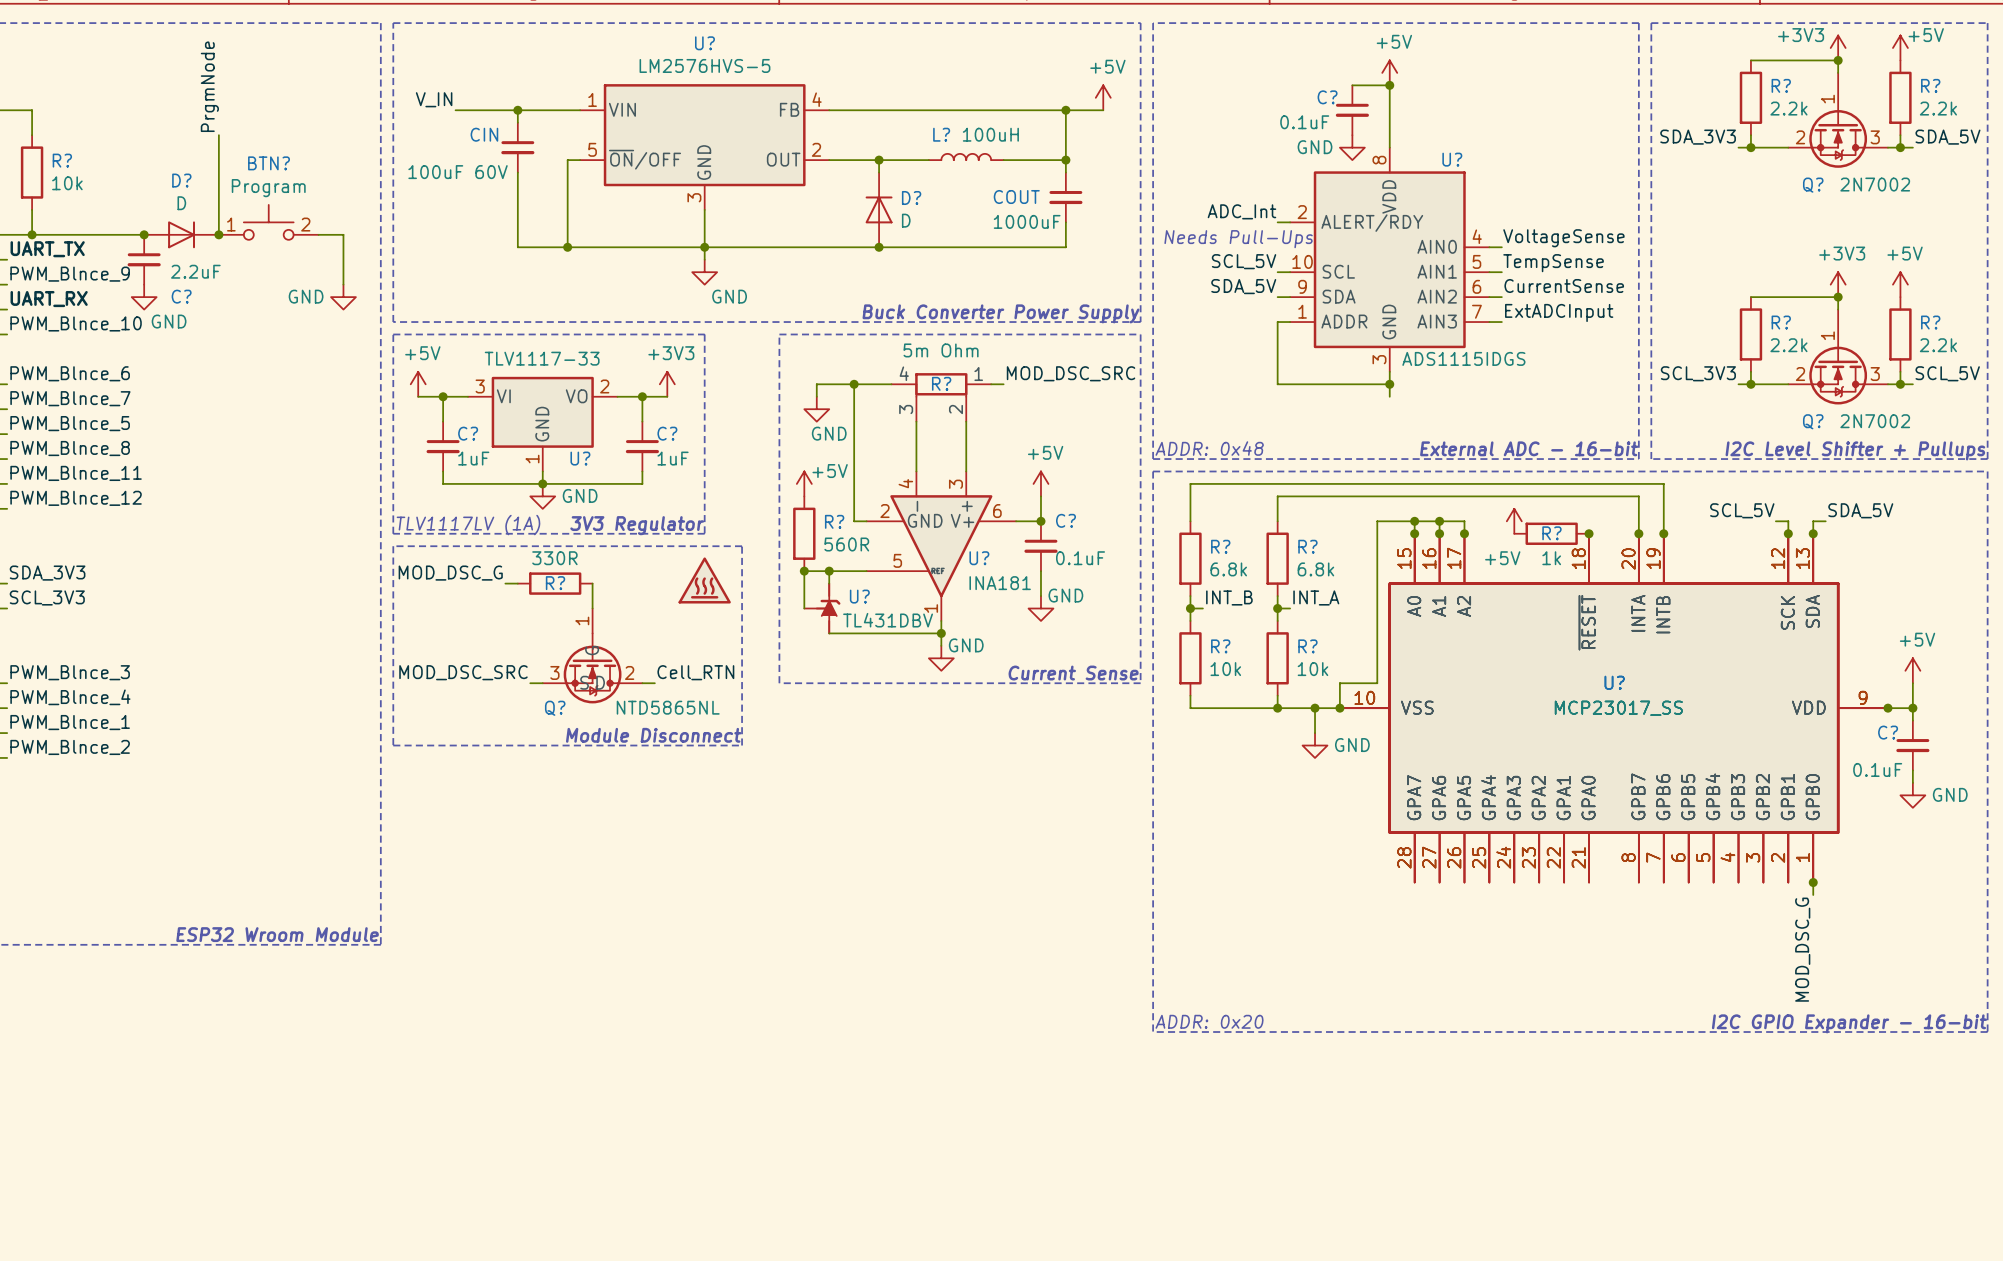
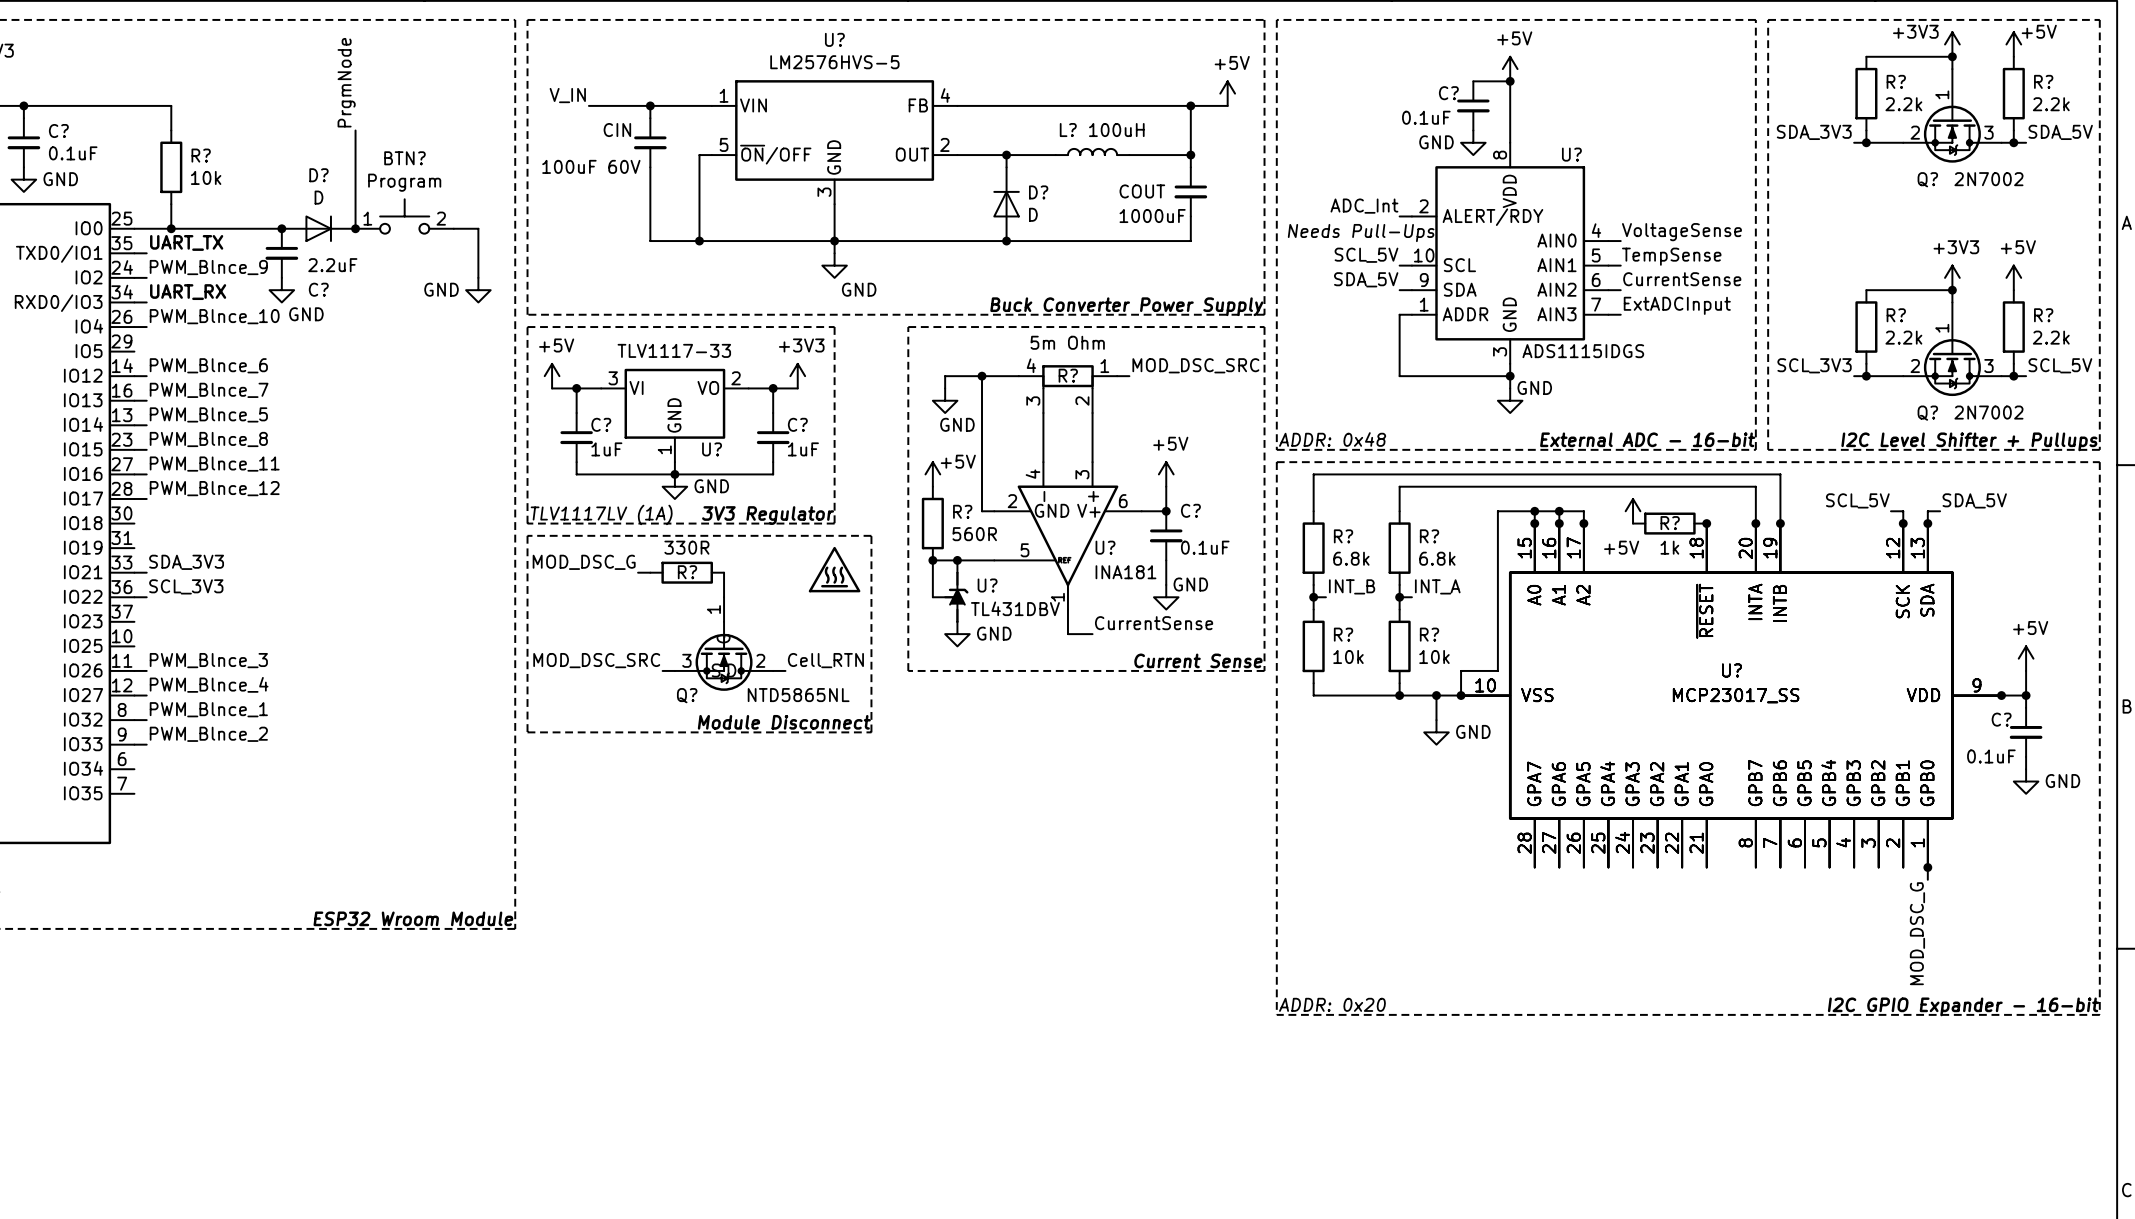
power symbol: none -> GND (1510, 400)
wire: (829, 633) (941, 633) -> none
junction: (941, 633) -> none
label: none -> CurrentSense (1154, 623)
wire: none -> (1067, 634) (1092, 634)
power symbol text position: GND (966, 645) -> GND (994, 633)
power symbol position: GND (941, 658) -> GND (957, 634)

